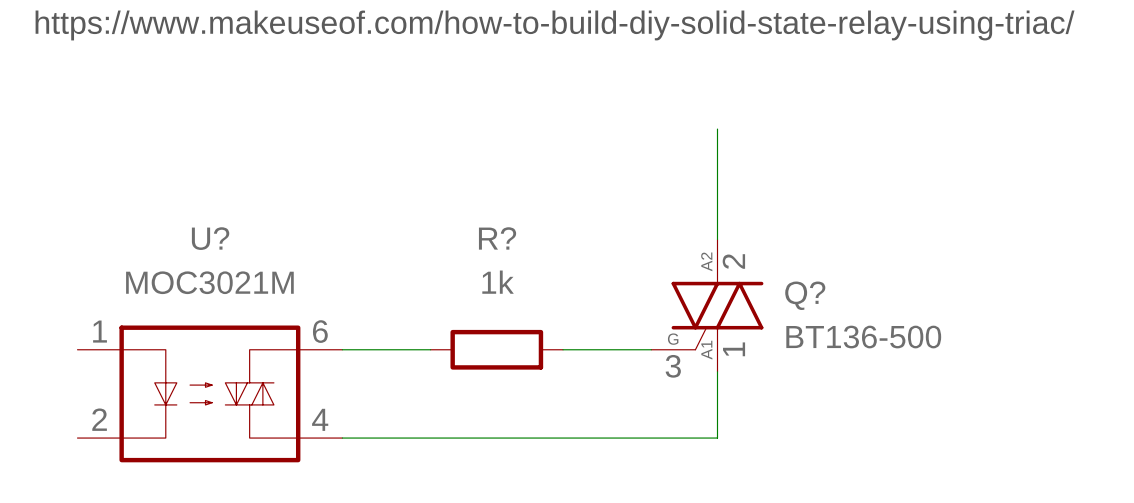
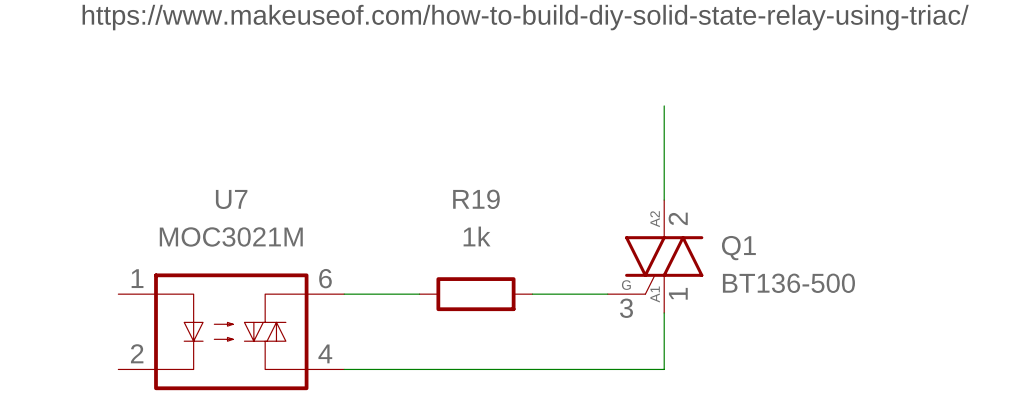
U? name: U? (210, 238) -> U7 (231, 199)
R? name: R? (497, 238) -> R19 (476, 199)
Q? name: Q? (805, 295) -> Q1 (738, 248)

